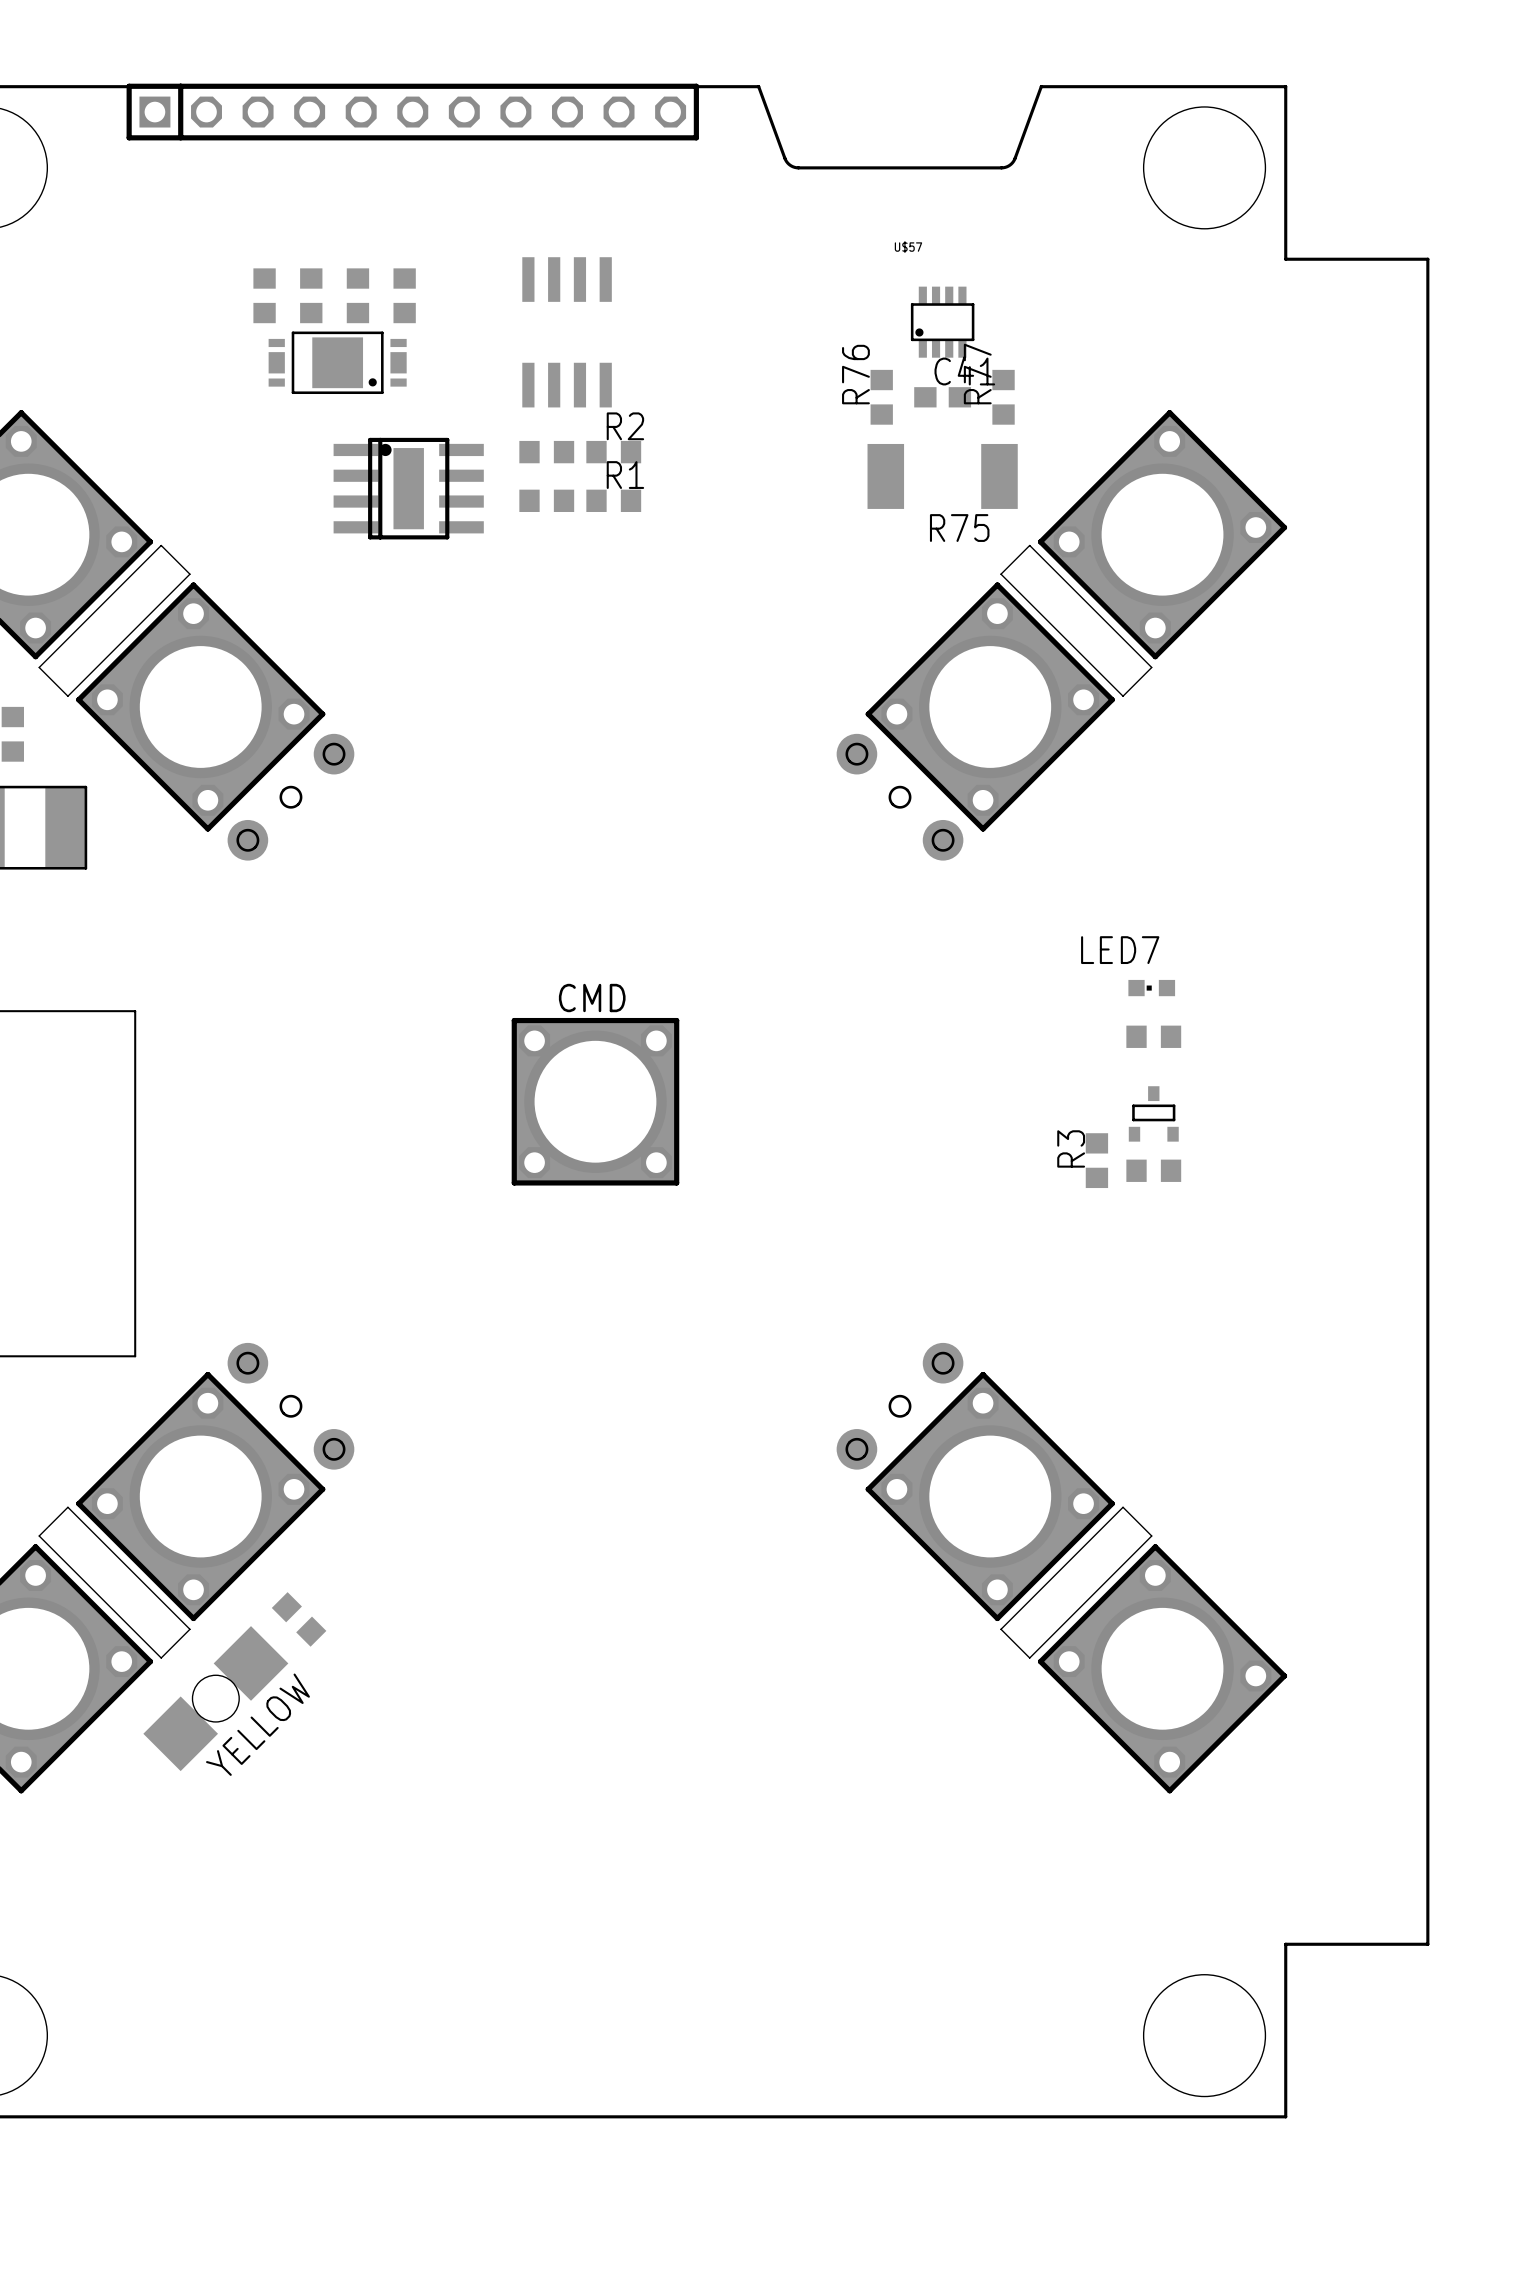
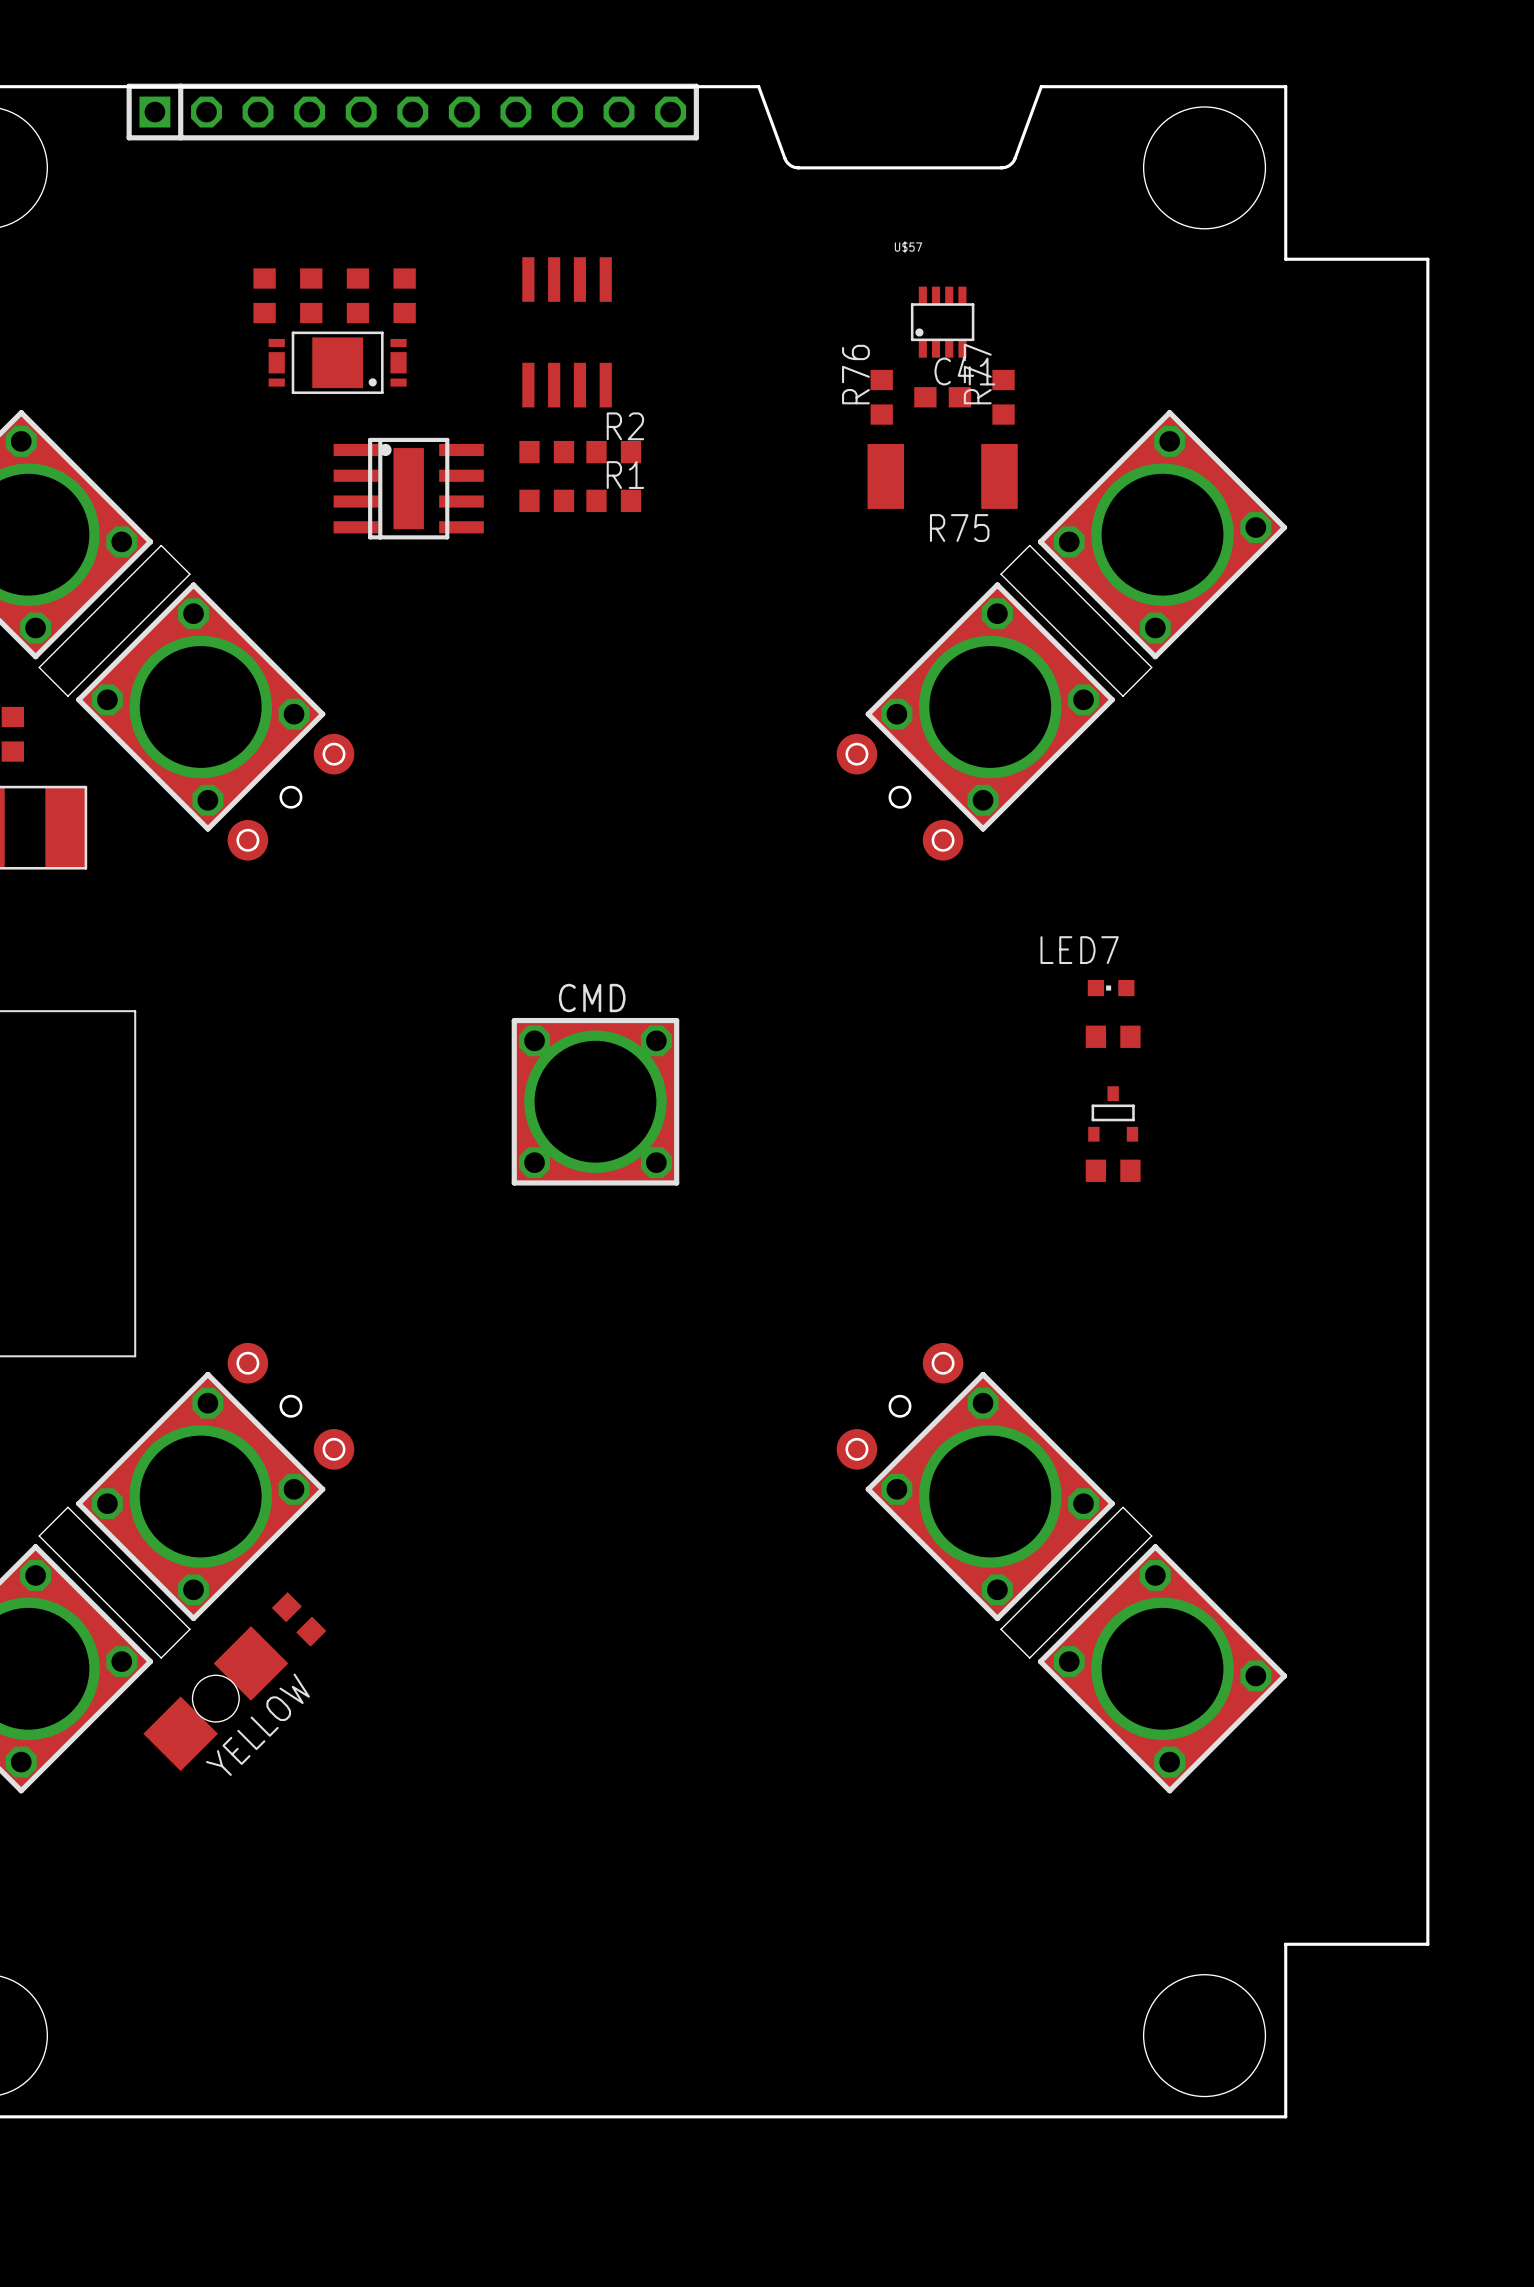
LED7 position: (1151, 988) -> (1111, 988)
part position: (1153, 1036) -> (1113, 1036)
part position: (1153, 1113) -> (1113, 1113)
R3: (1096, 1160) -> none
part position: (1153, 1170) -> (1113, 1170)

